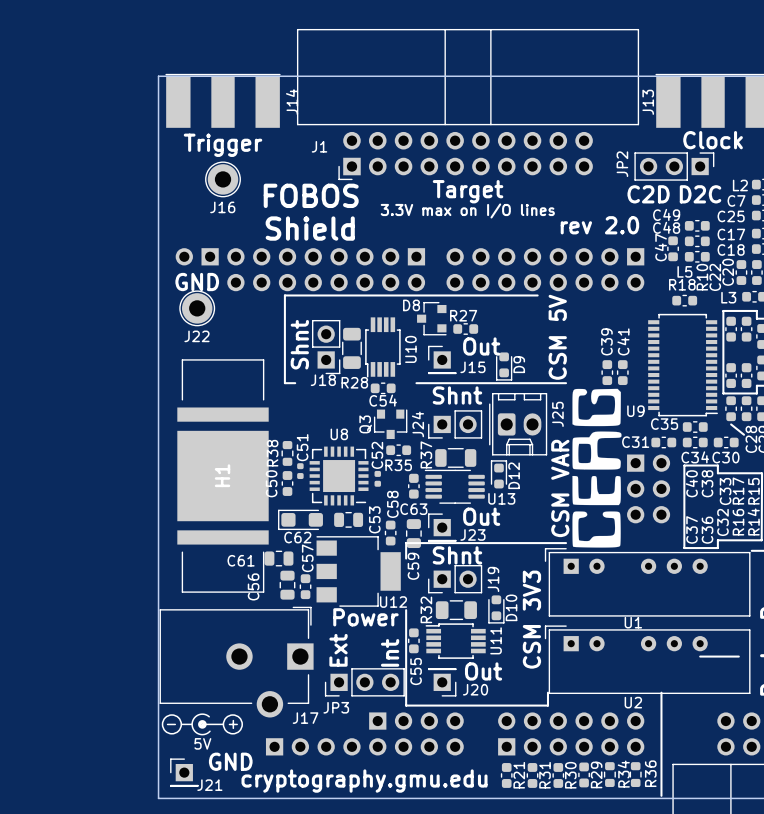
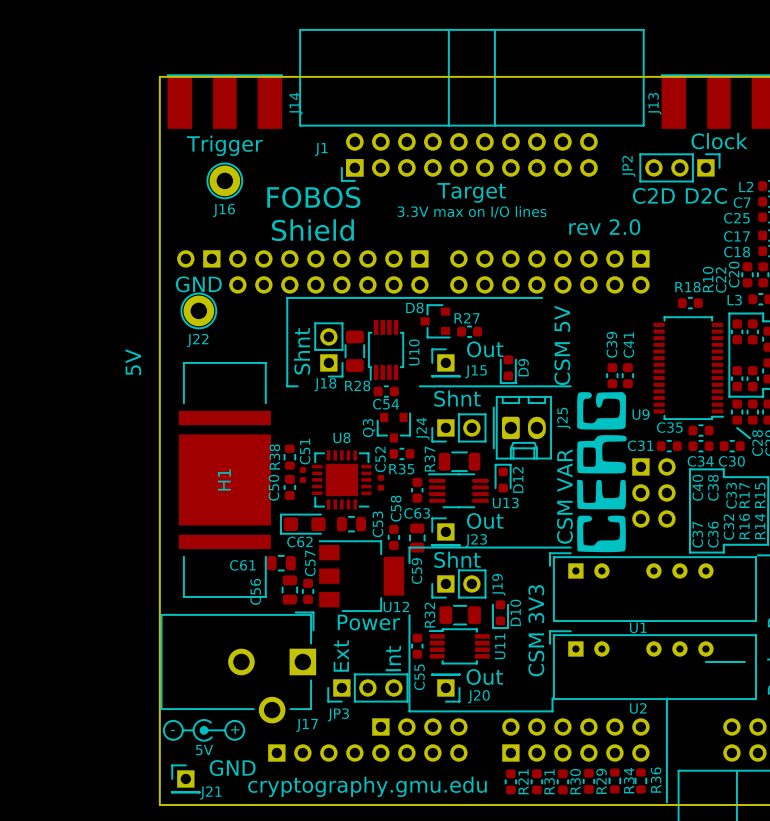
C49: (697, 225) -> none
C48: (697, 241) -> none
C47: (673, 248) -> none
L5: (697, 256) -> none
text: none -> 5V (133, 362)

